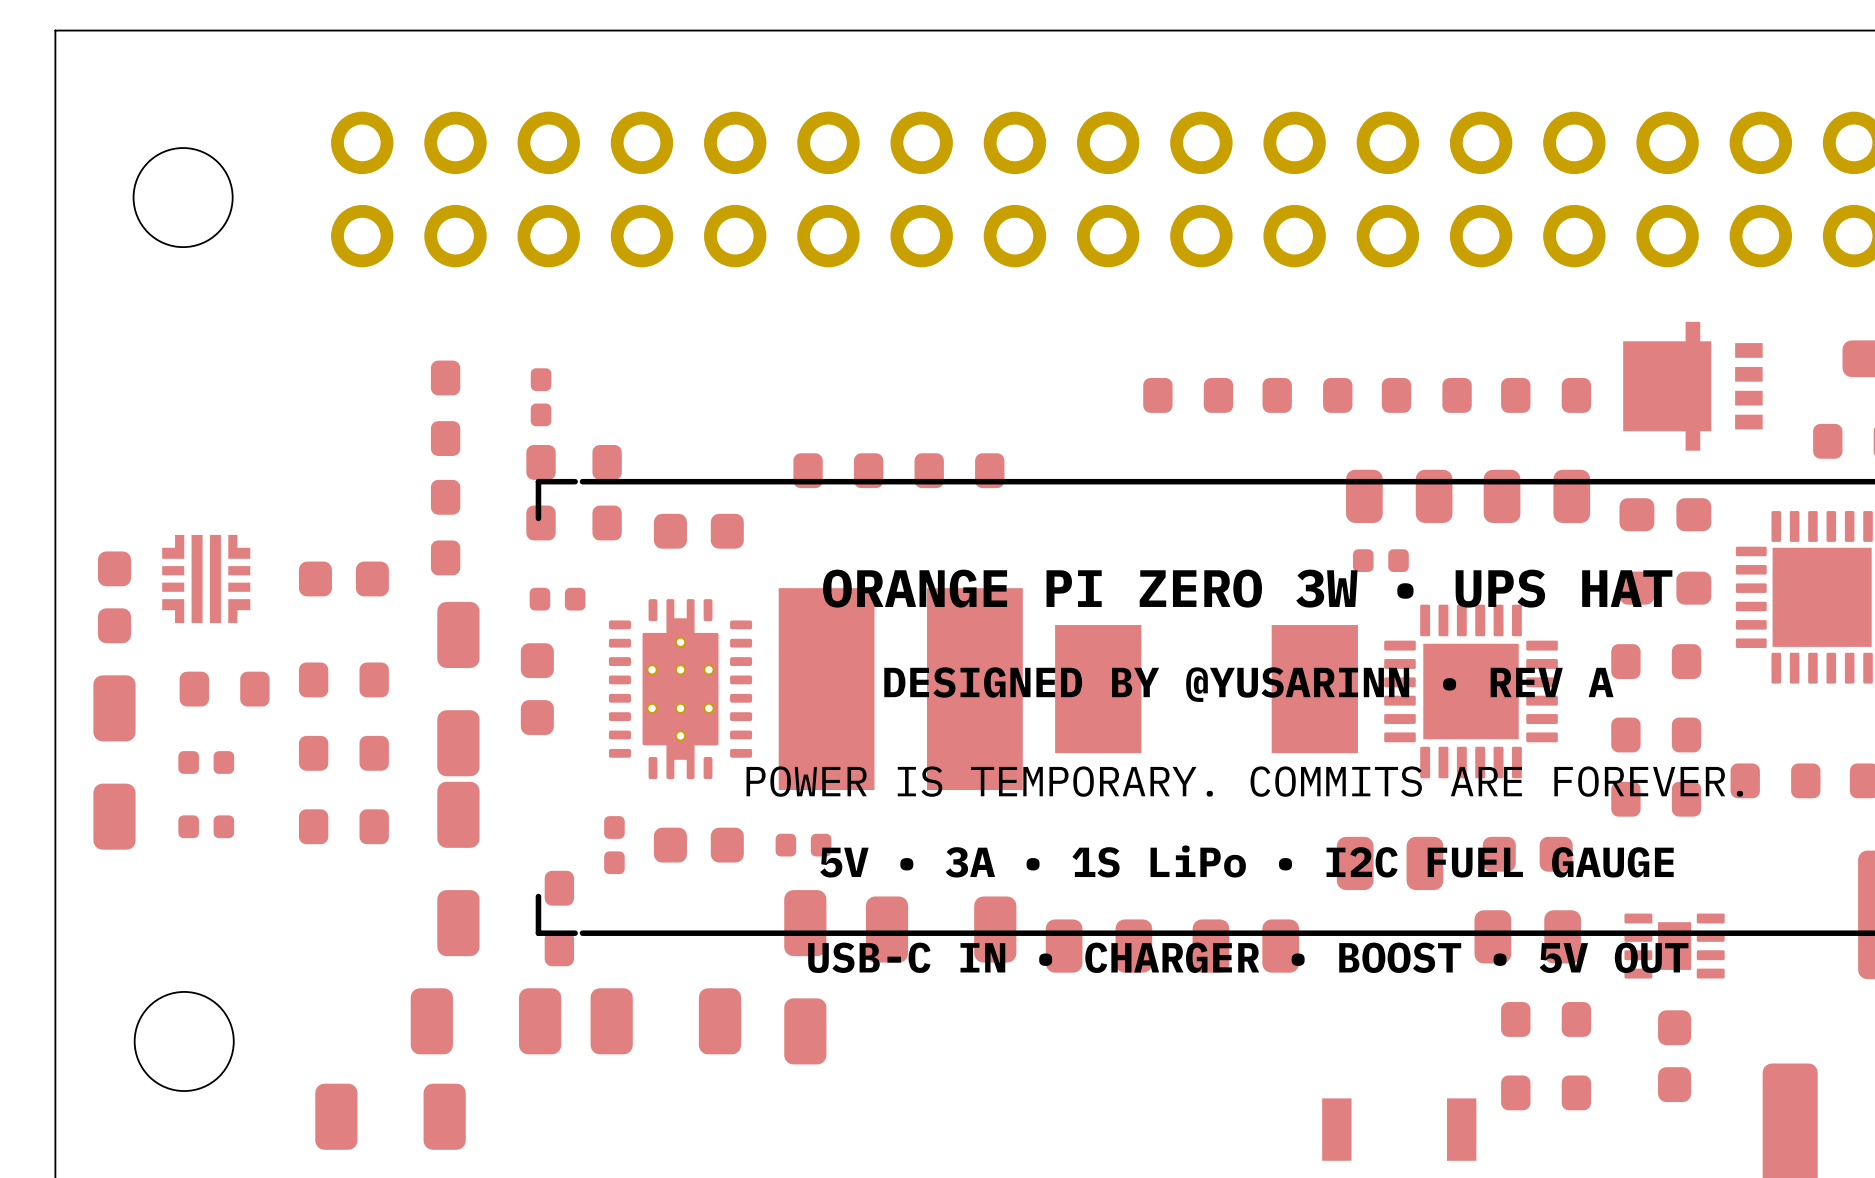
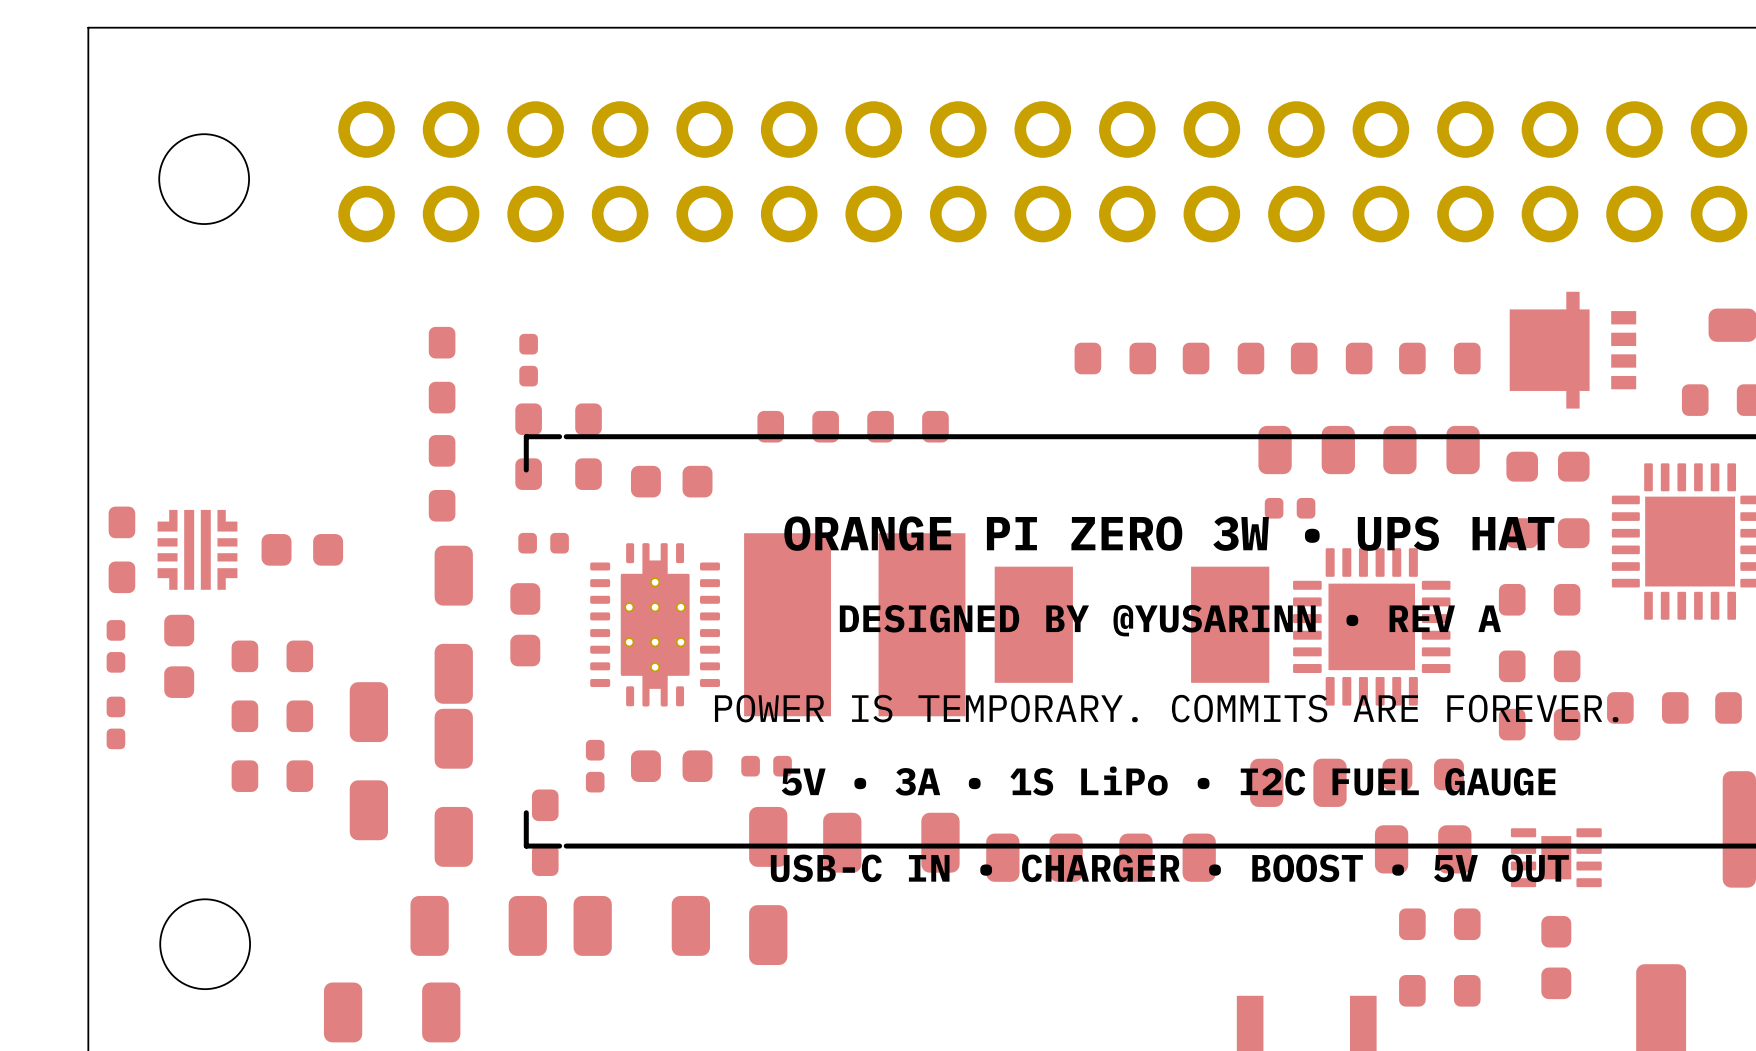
part footprint: [97, 551, 131, 644] -> [108, 506, 136, 594]
part position: (206, 578) -> (197, 549)
part position: (343, 578) -> (302, 549)
part: (343, 679) -> none
part: (224, 689) -> none
part: none -> (115, 646)
part: none -> (179, 656)
part: none -> (272, 656)
part: (343, 753) -> none
part: (114, 762) -> none
part: (206, 762) -> none
part: none -> (272, 716)
part: none -> (115, 722)
part footprint: [298, 809, 389, 845] -> [349, 682, 389, 841]
part: (206, 826) -> none
part: none -> (272, 776)

